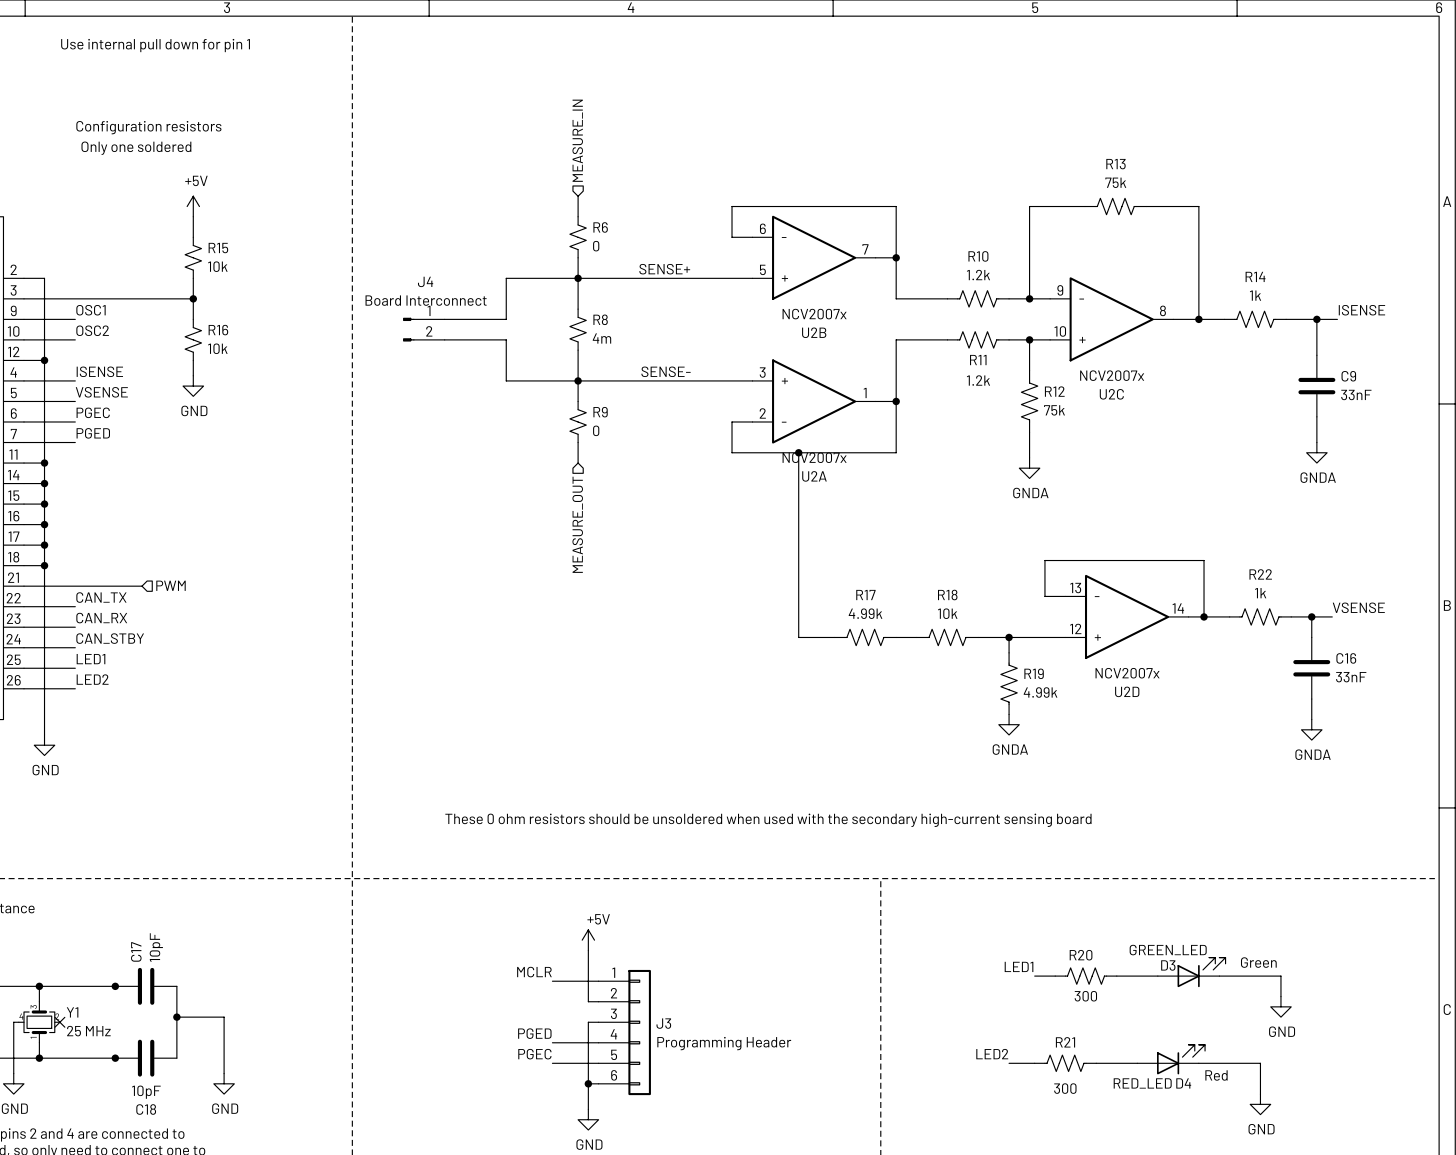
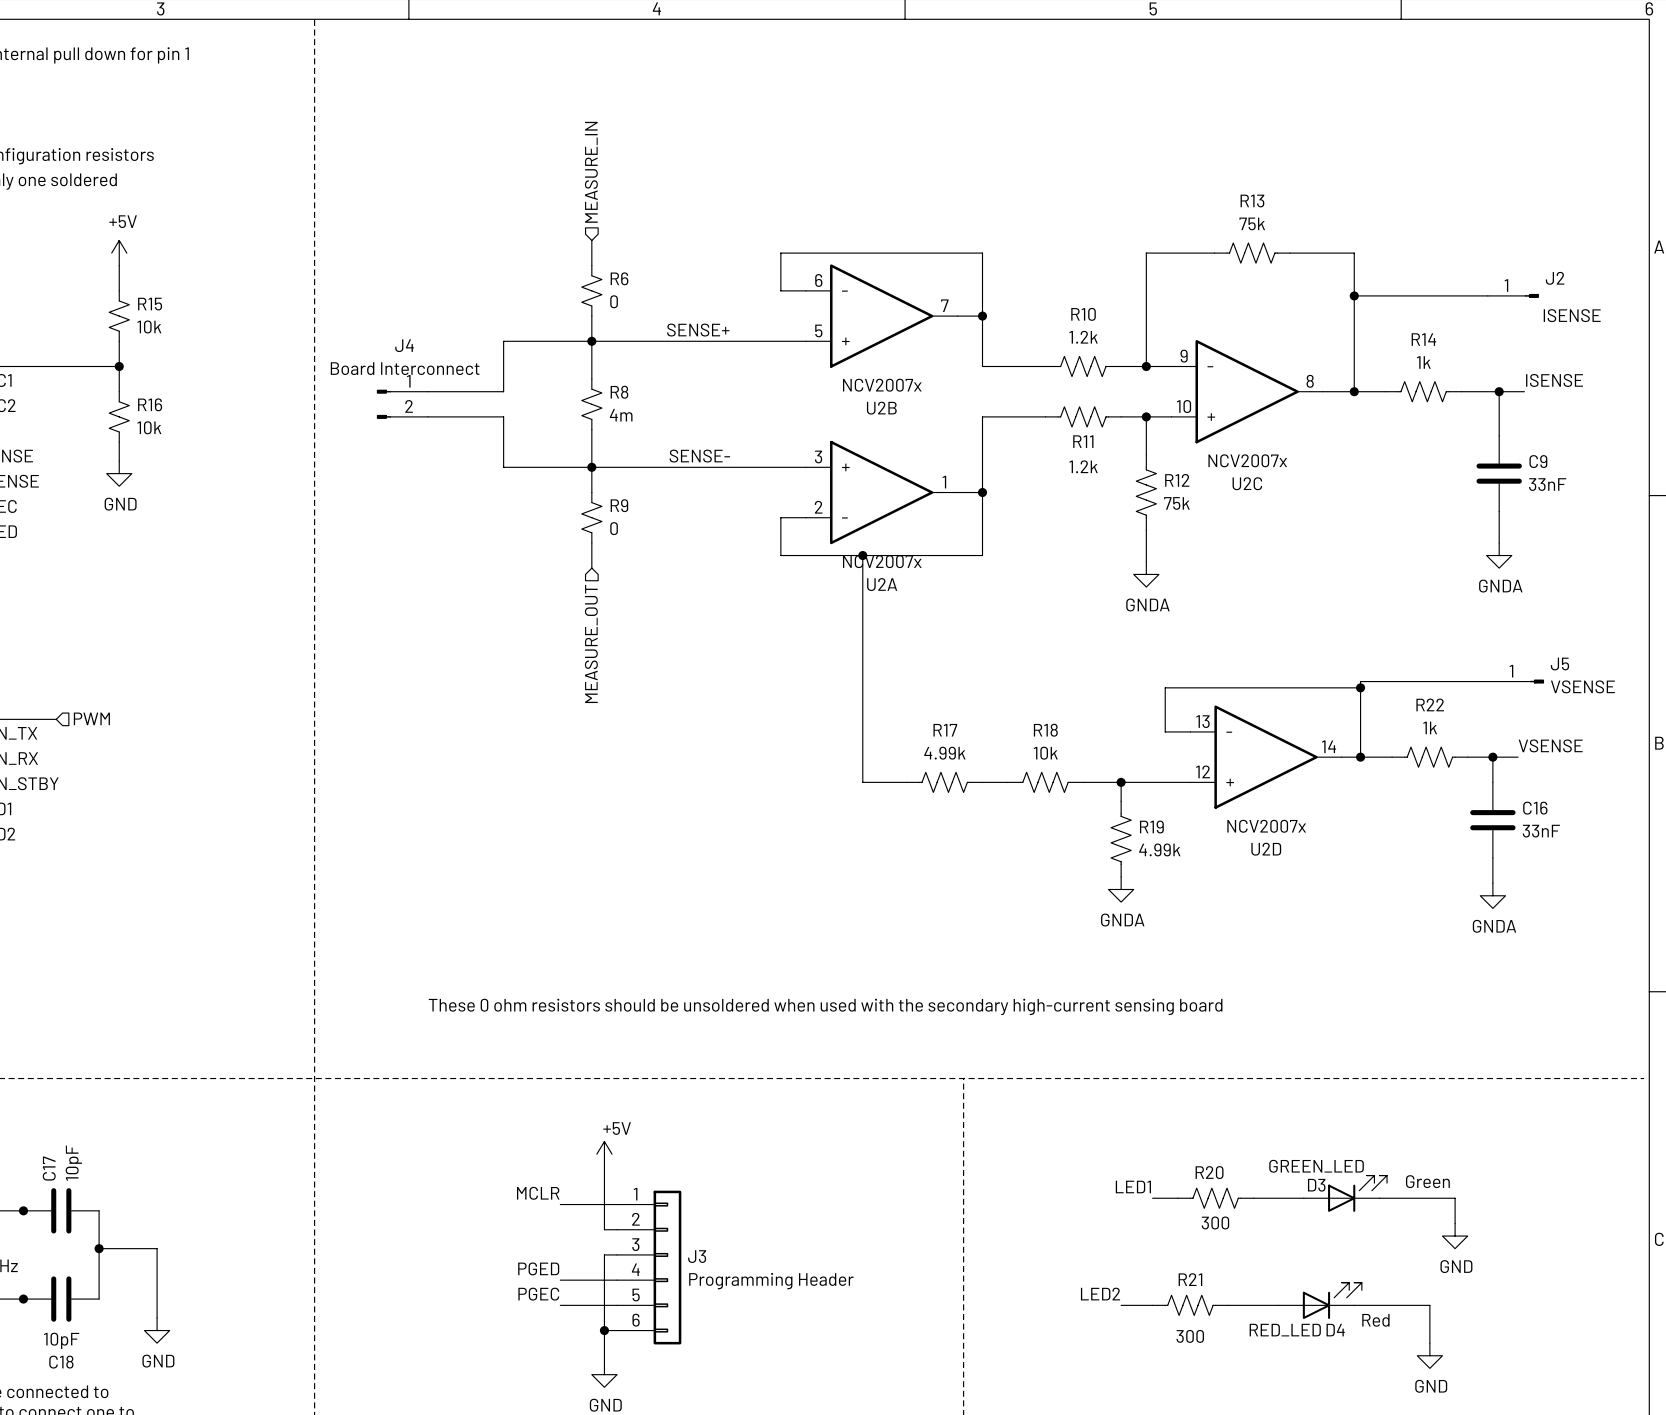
wire: none -> (1354, 295) (1487, 295)
junction: none -> (1354, 295)
J2: none -> ISENSE (1513, 295)
wire: none -> (1492, 681) (1360, 681) (1360, 687)
J5: none -> VSENSE (1518, 681)
junction: none -> (1360, 687)

